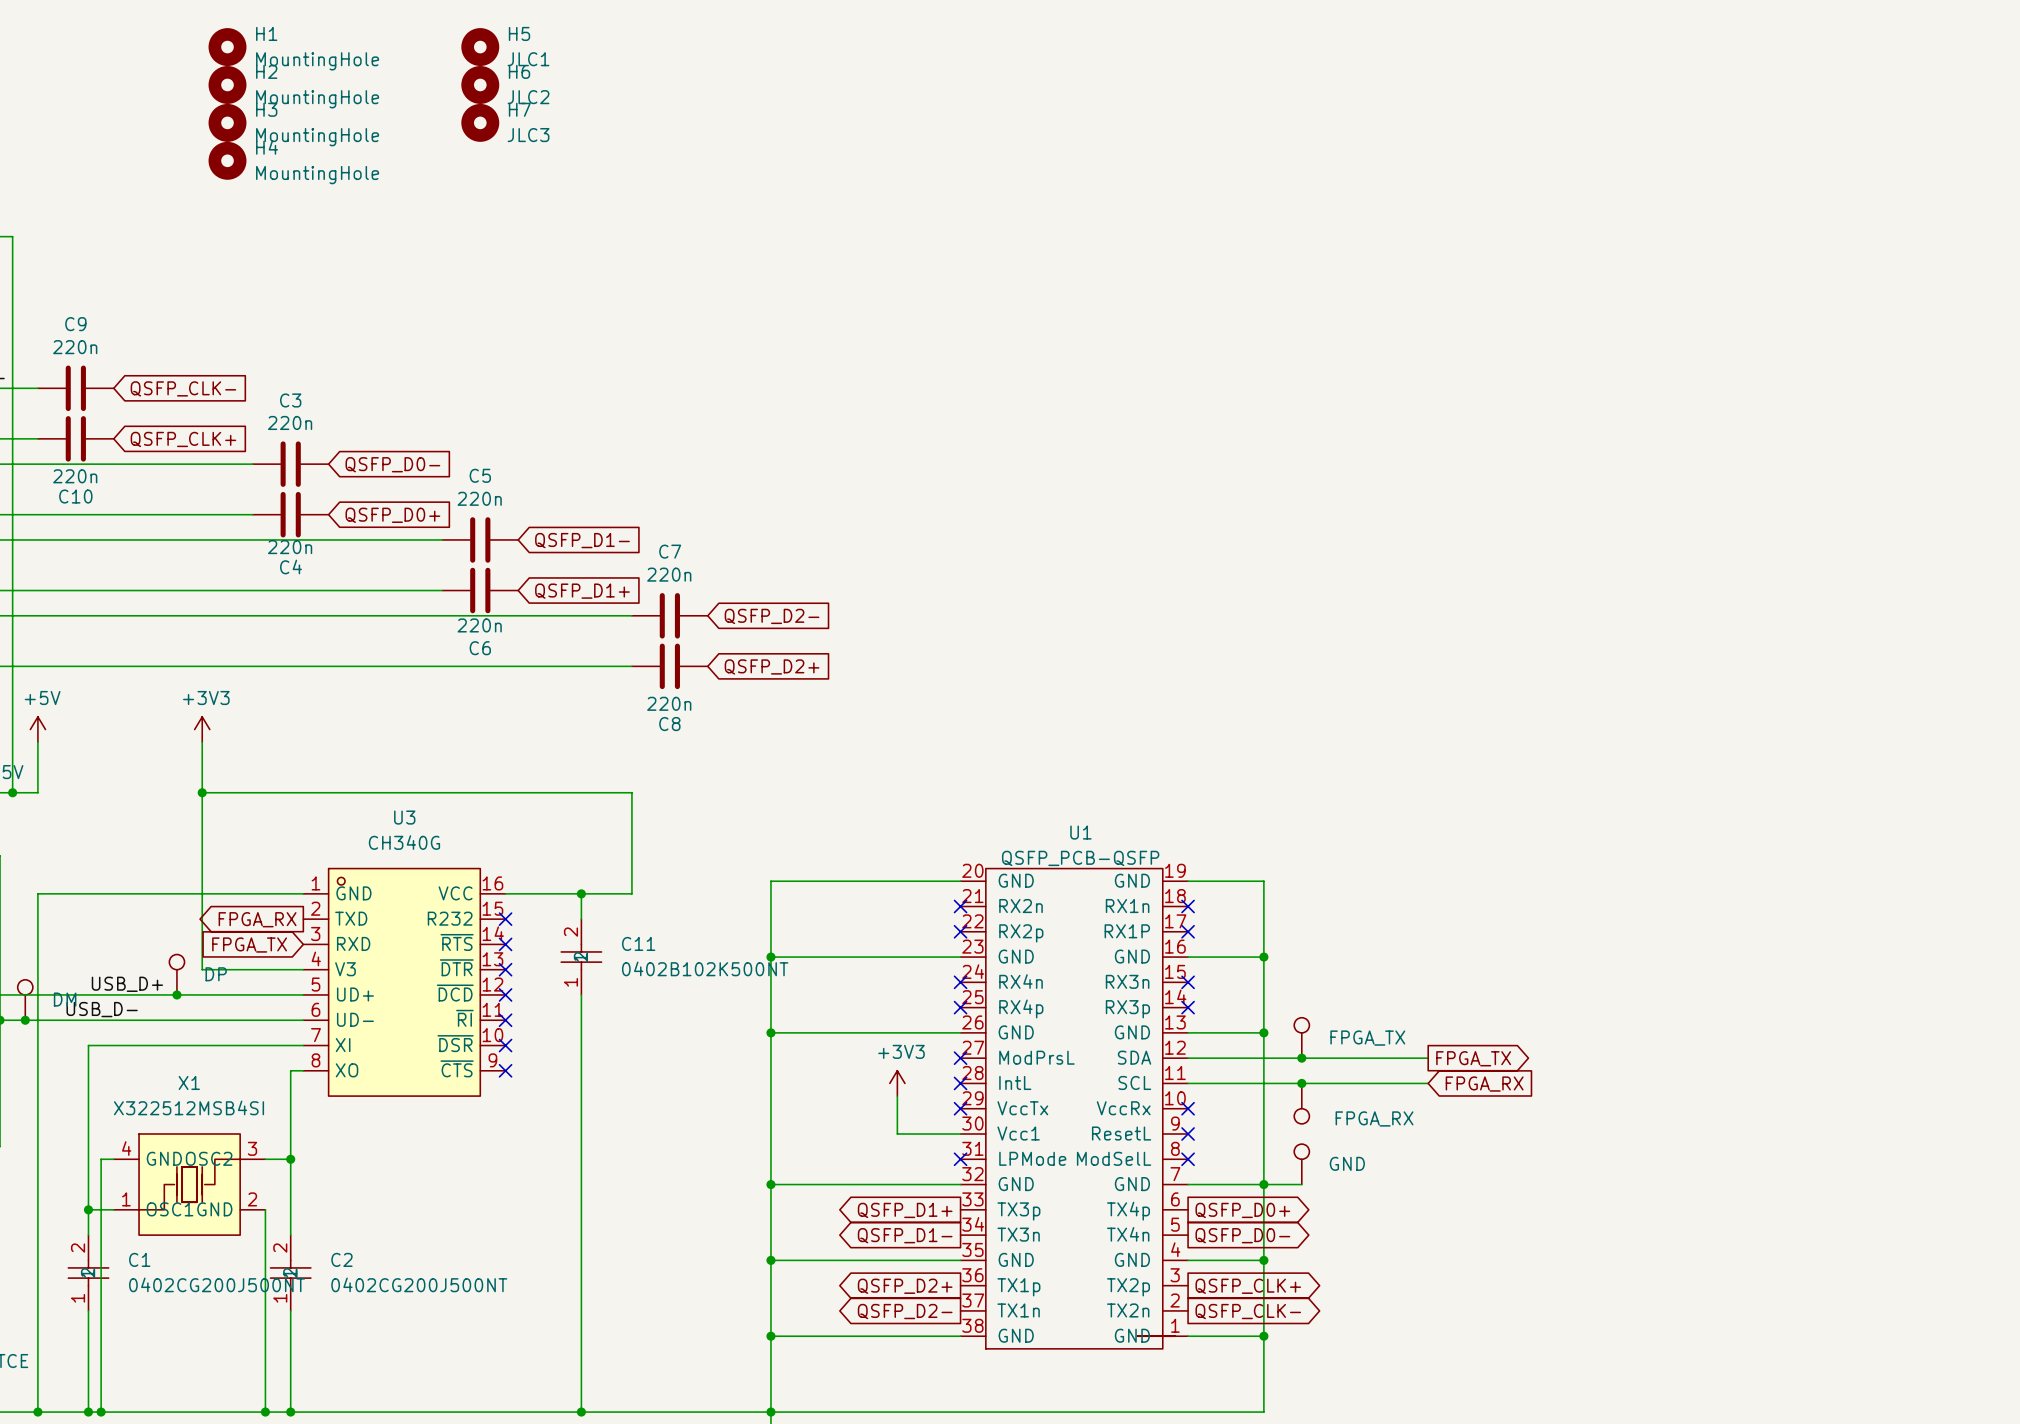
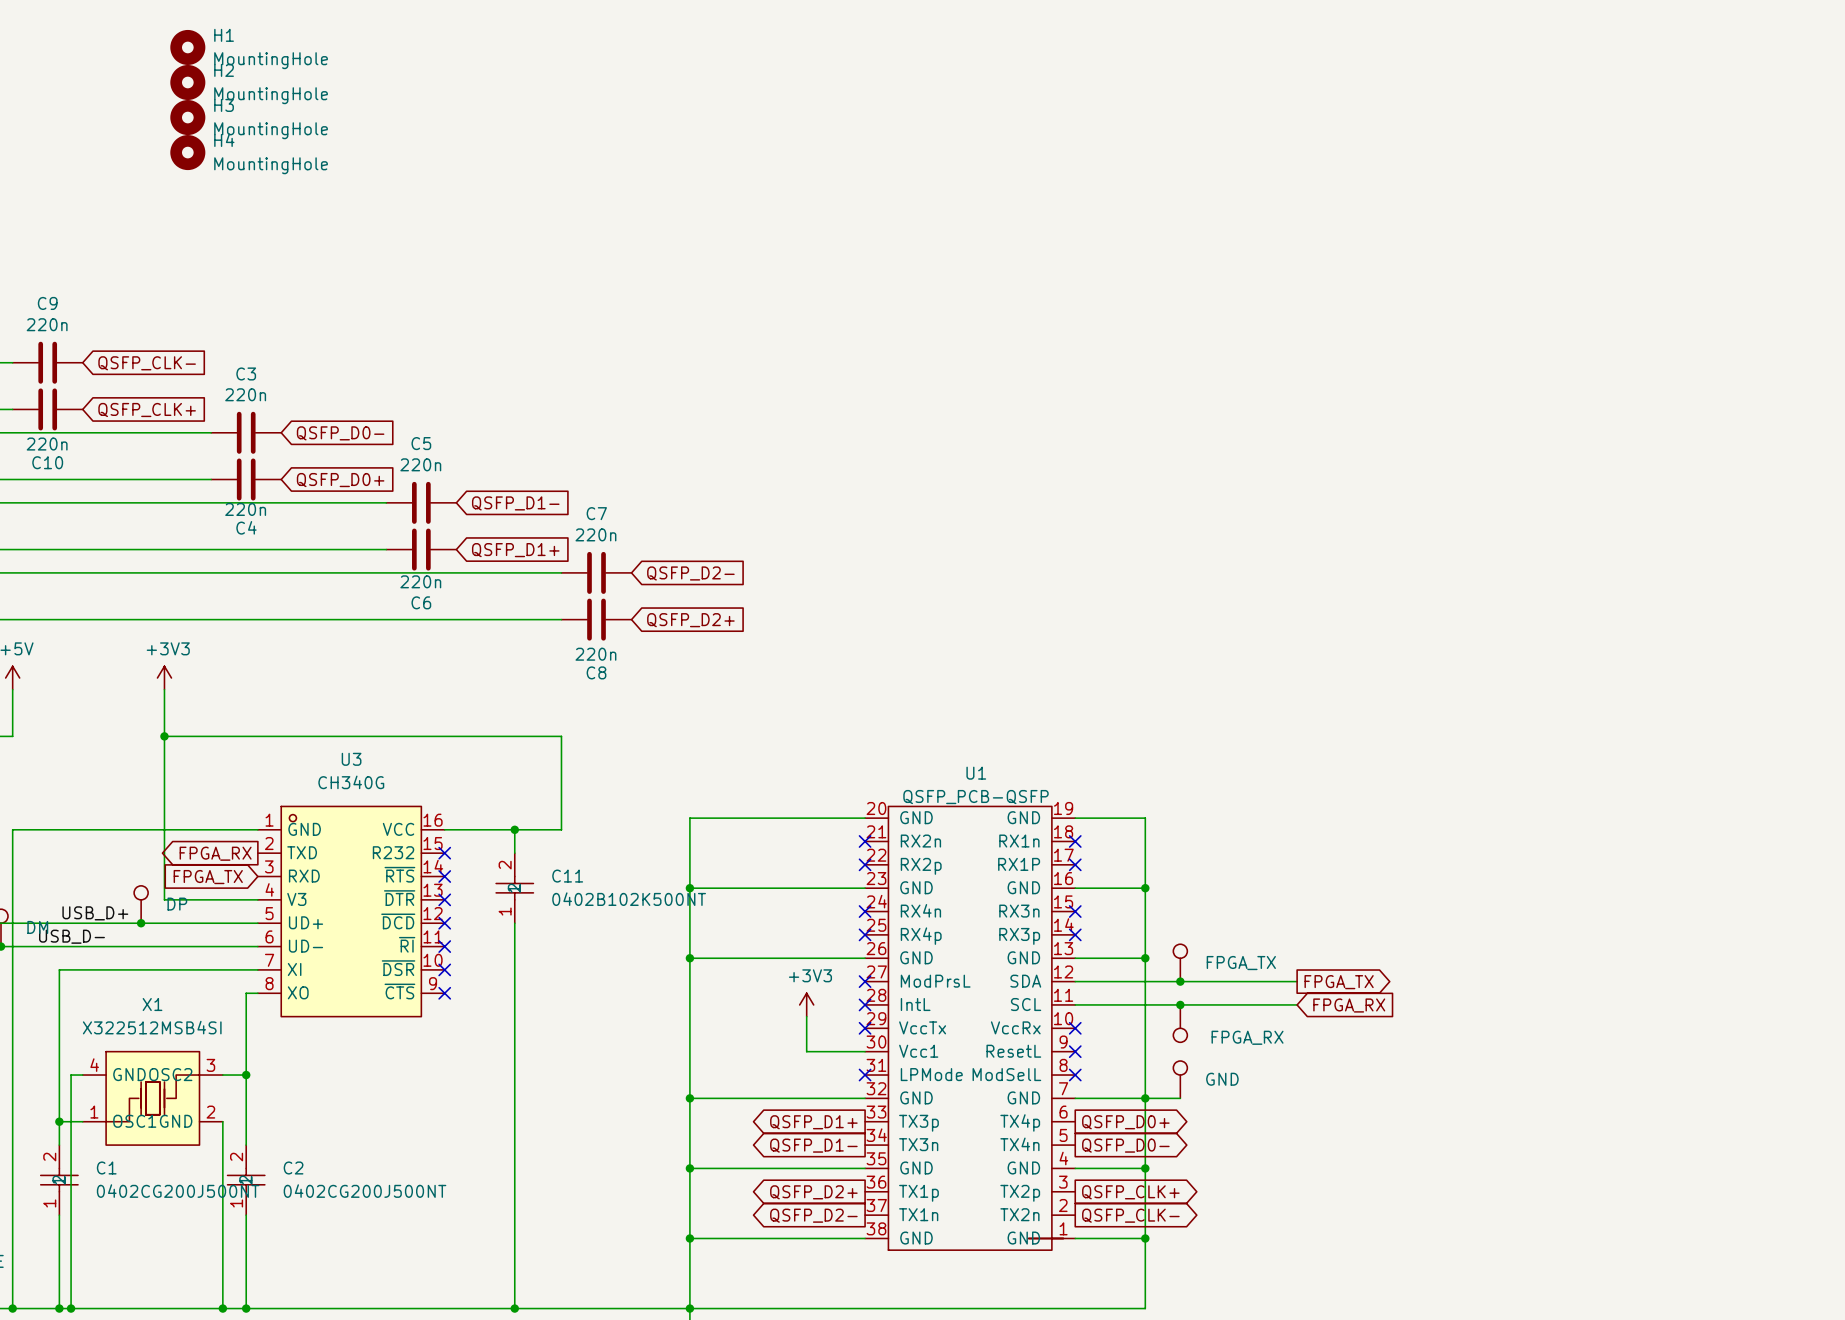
H5: JLC1 (480, 47) -> none
H6: JLC2 (480, 84) -> none
H7: JLC3 (480, 122) -> none

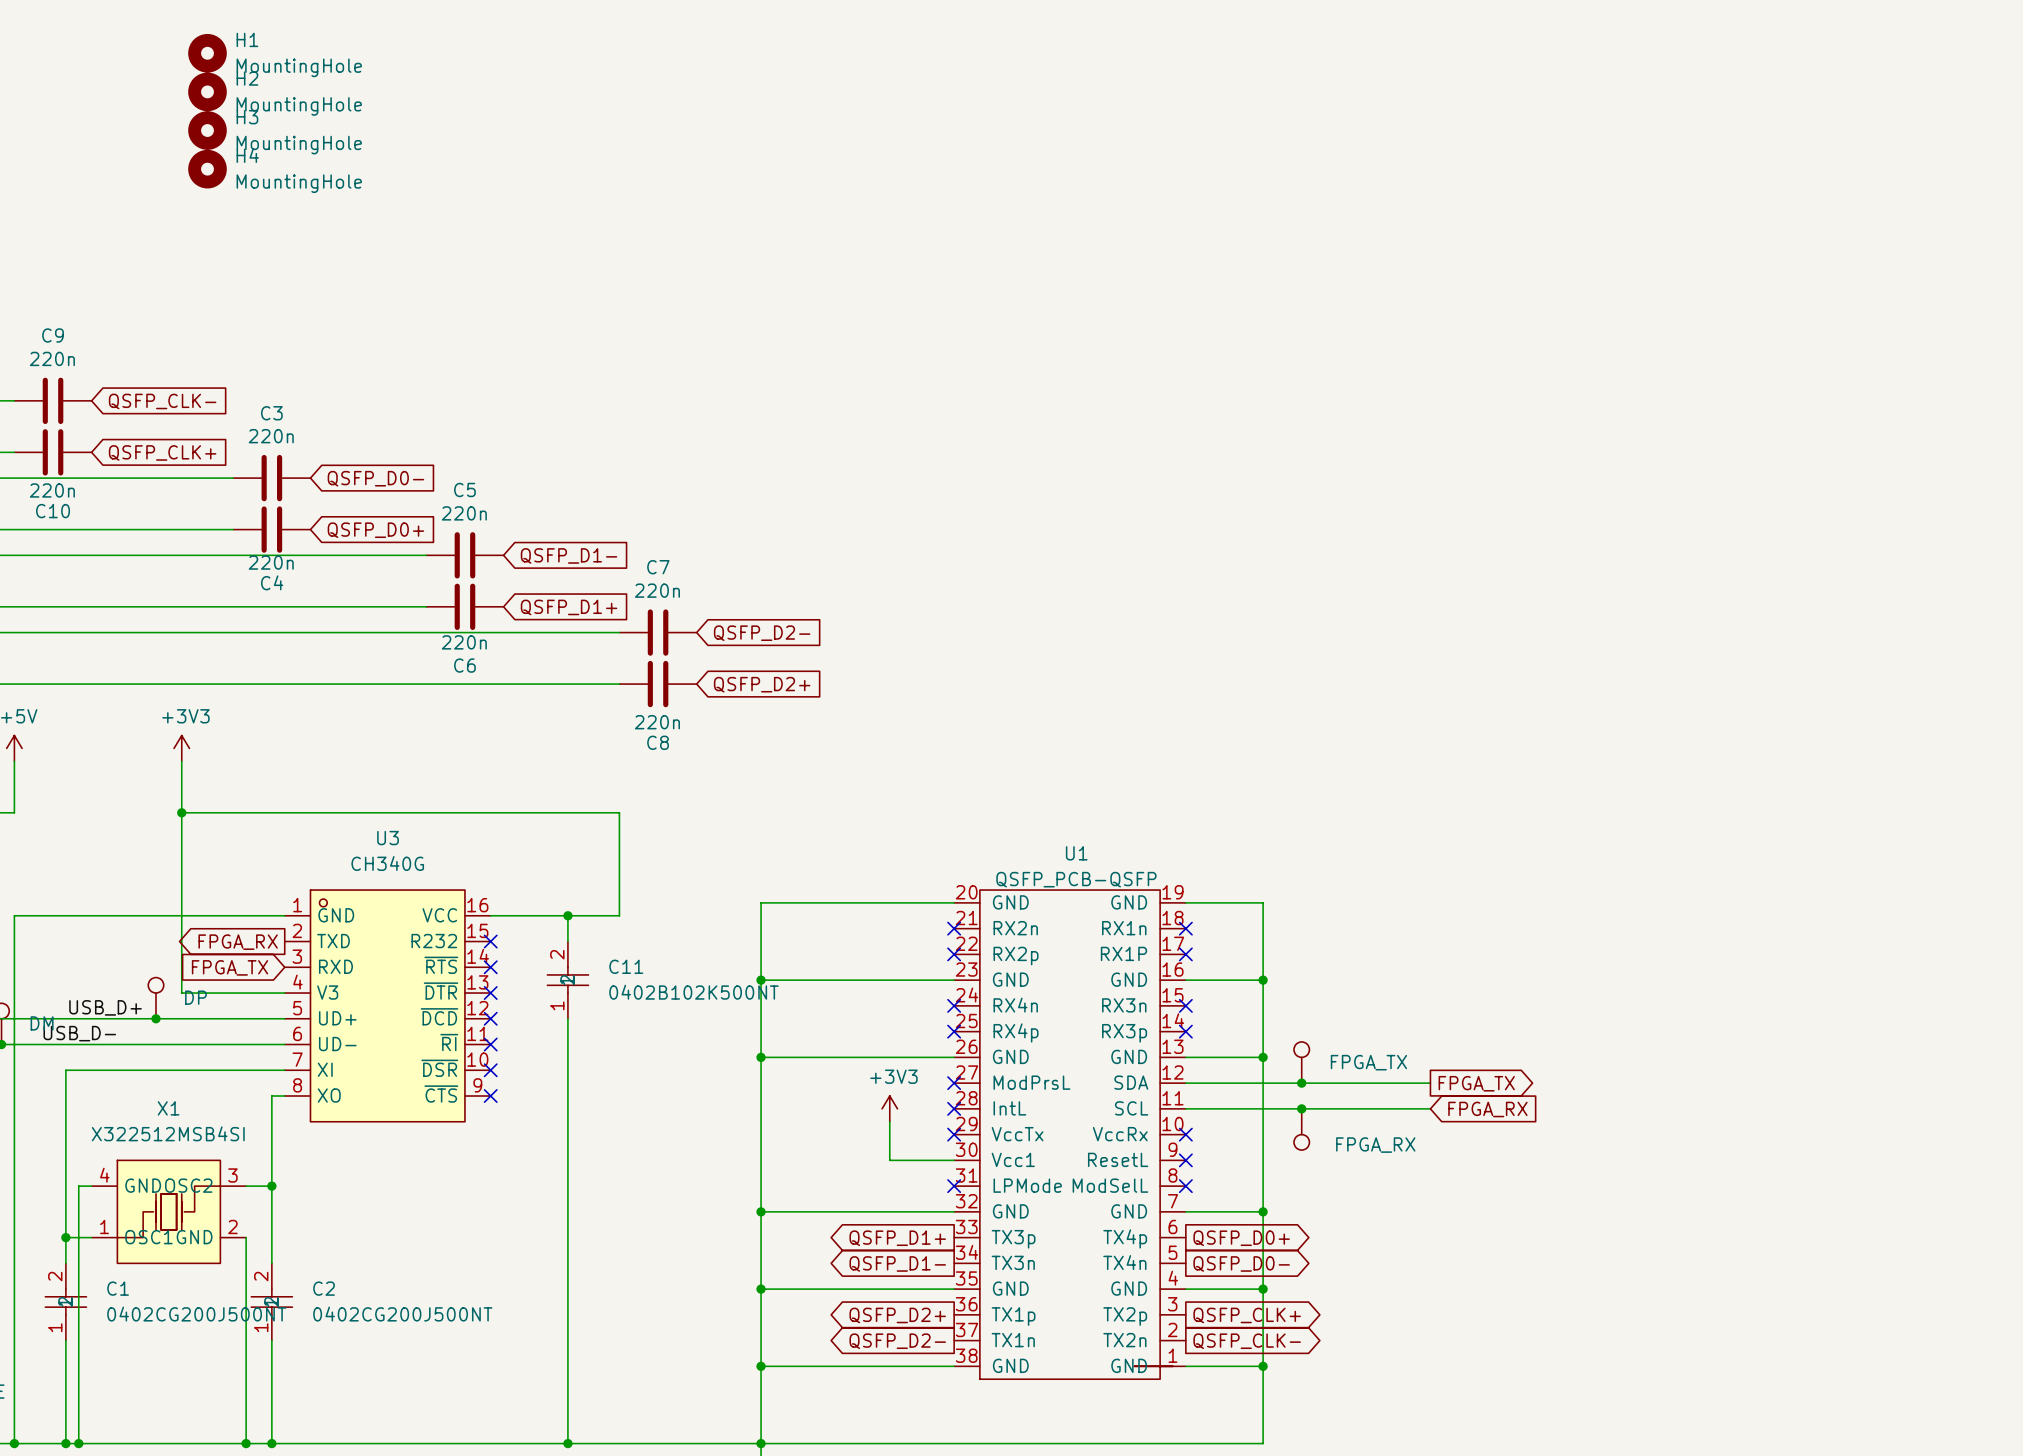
part: GND (1180, 1079) -> none
wire: (1145, 1098) (1180, 1098) -> none

